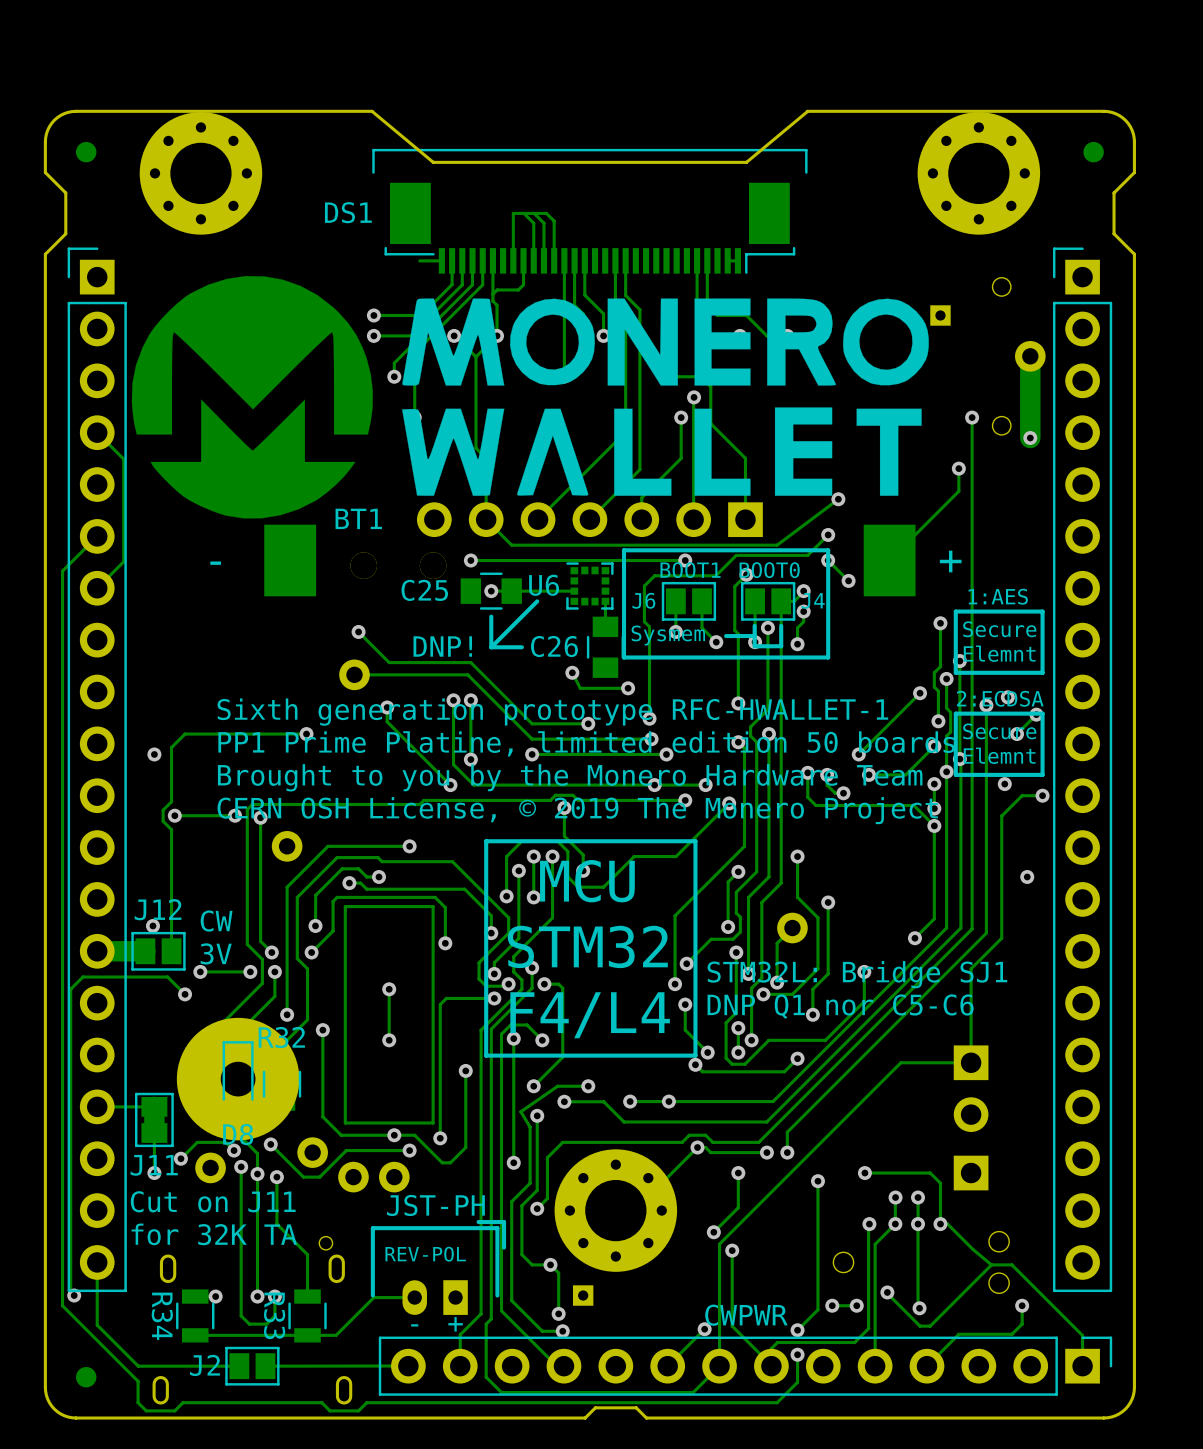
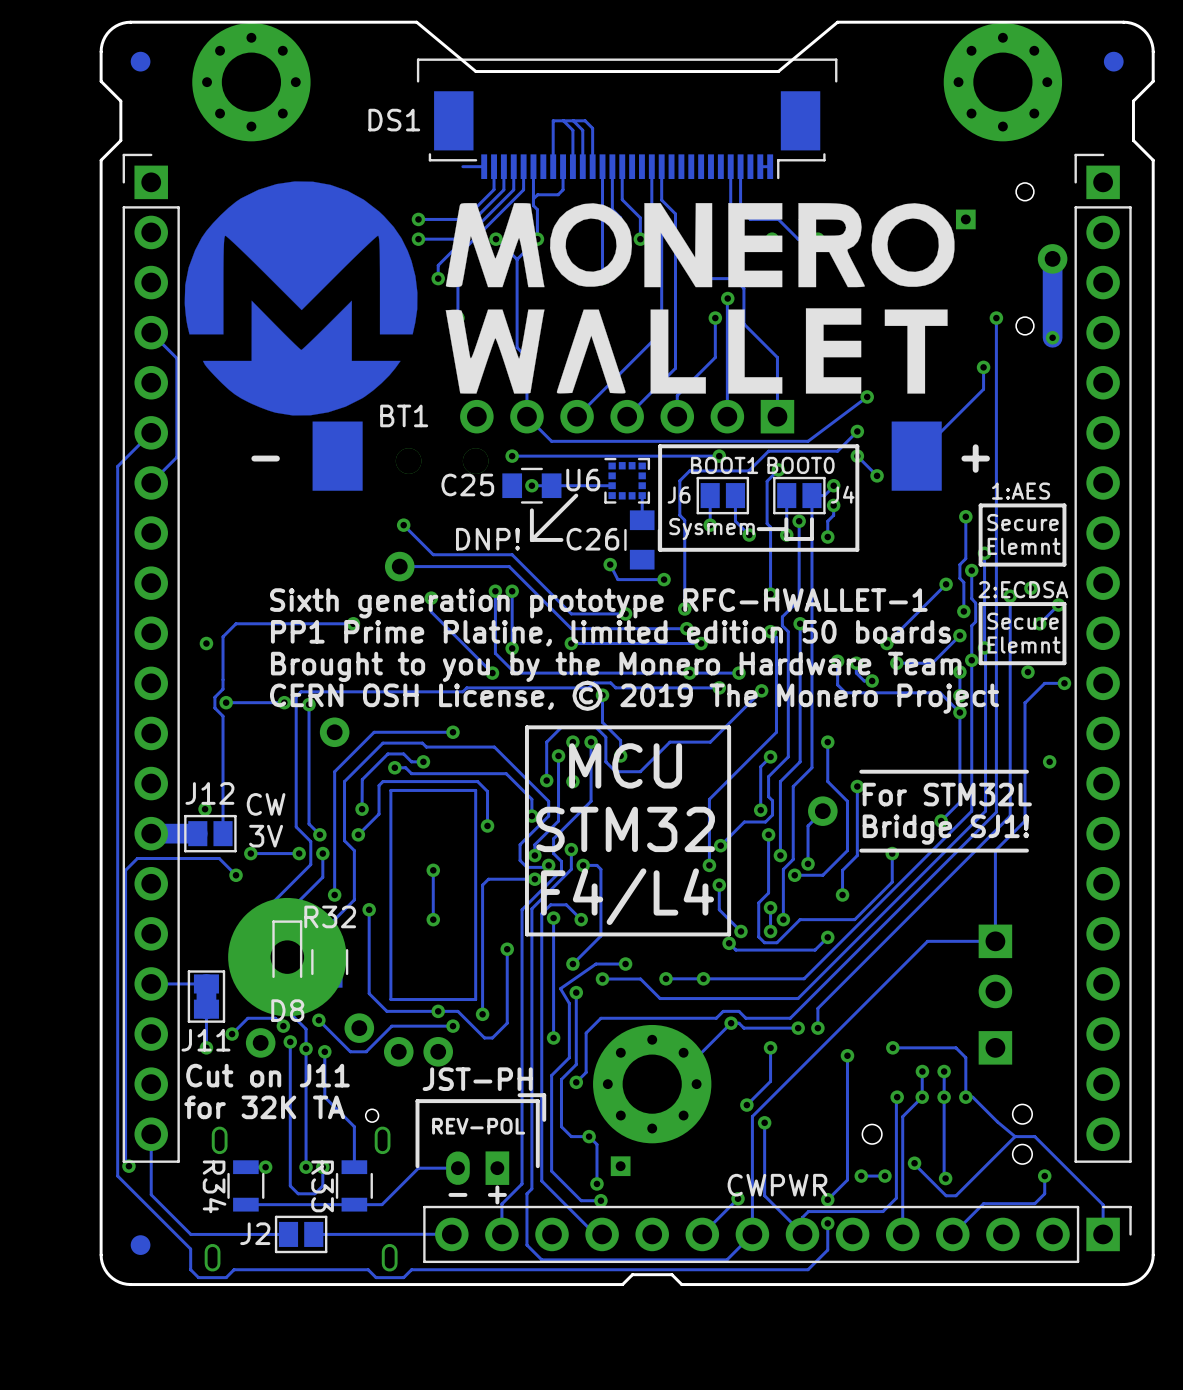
line: none -> (1026, 771) (861, 771)
text: none -> For STM32L (947, 794)
line: none -> (1026, 850) (861, 850)
text: STM32L: Bridge SJ1 (857, 974) -> Bridge SJ1! (945, 829)
text: DNP Q1 nor C5-C6 (840, 1006) -> none

